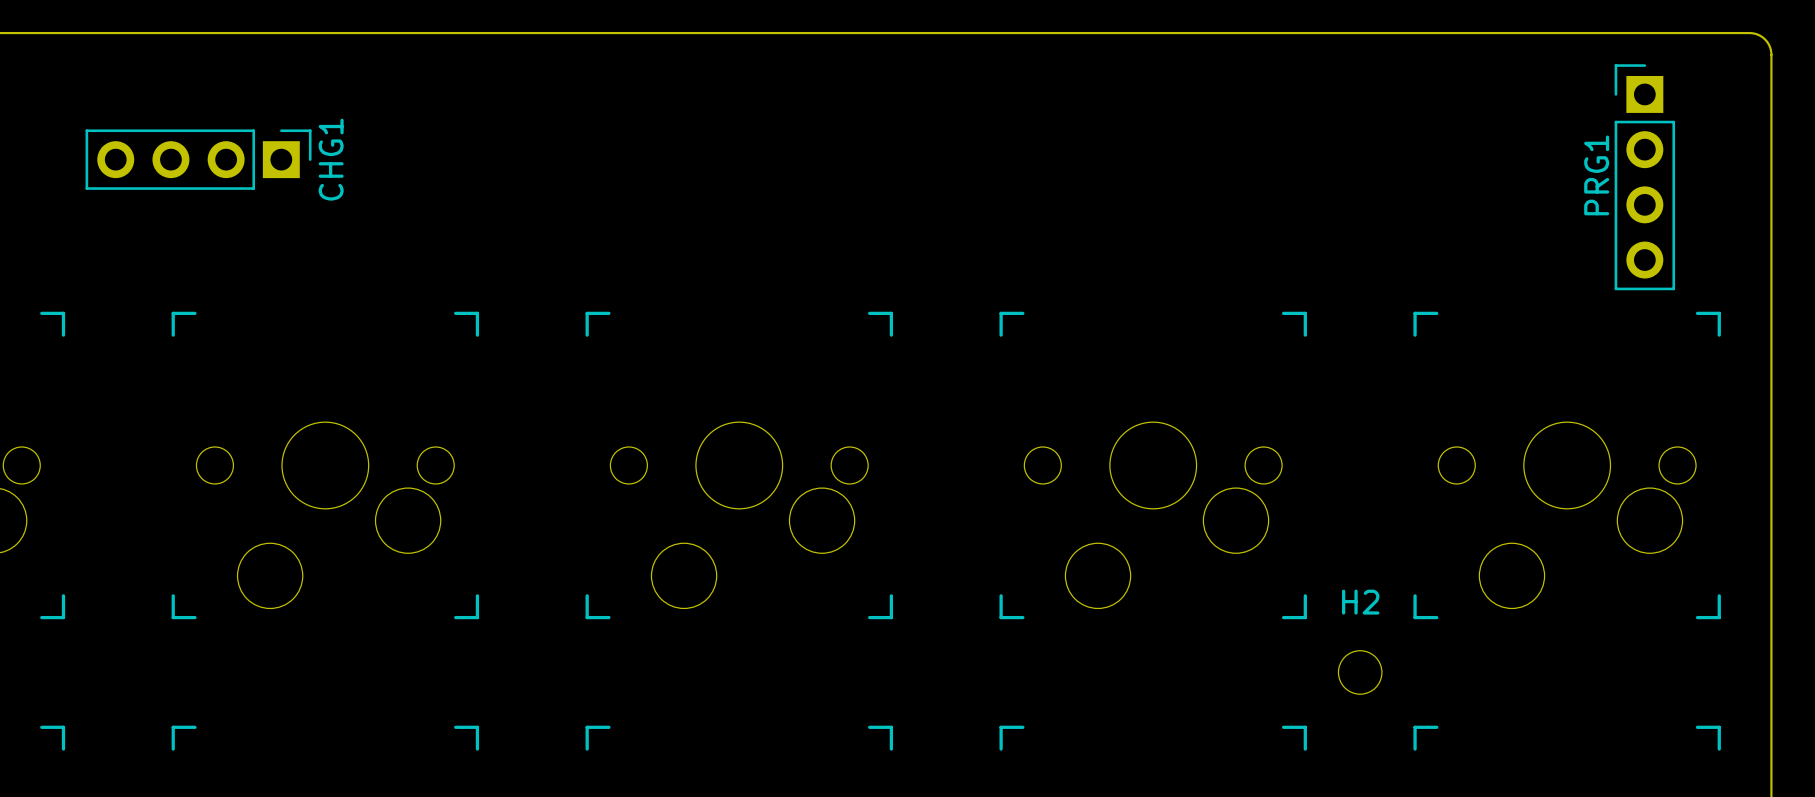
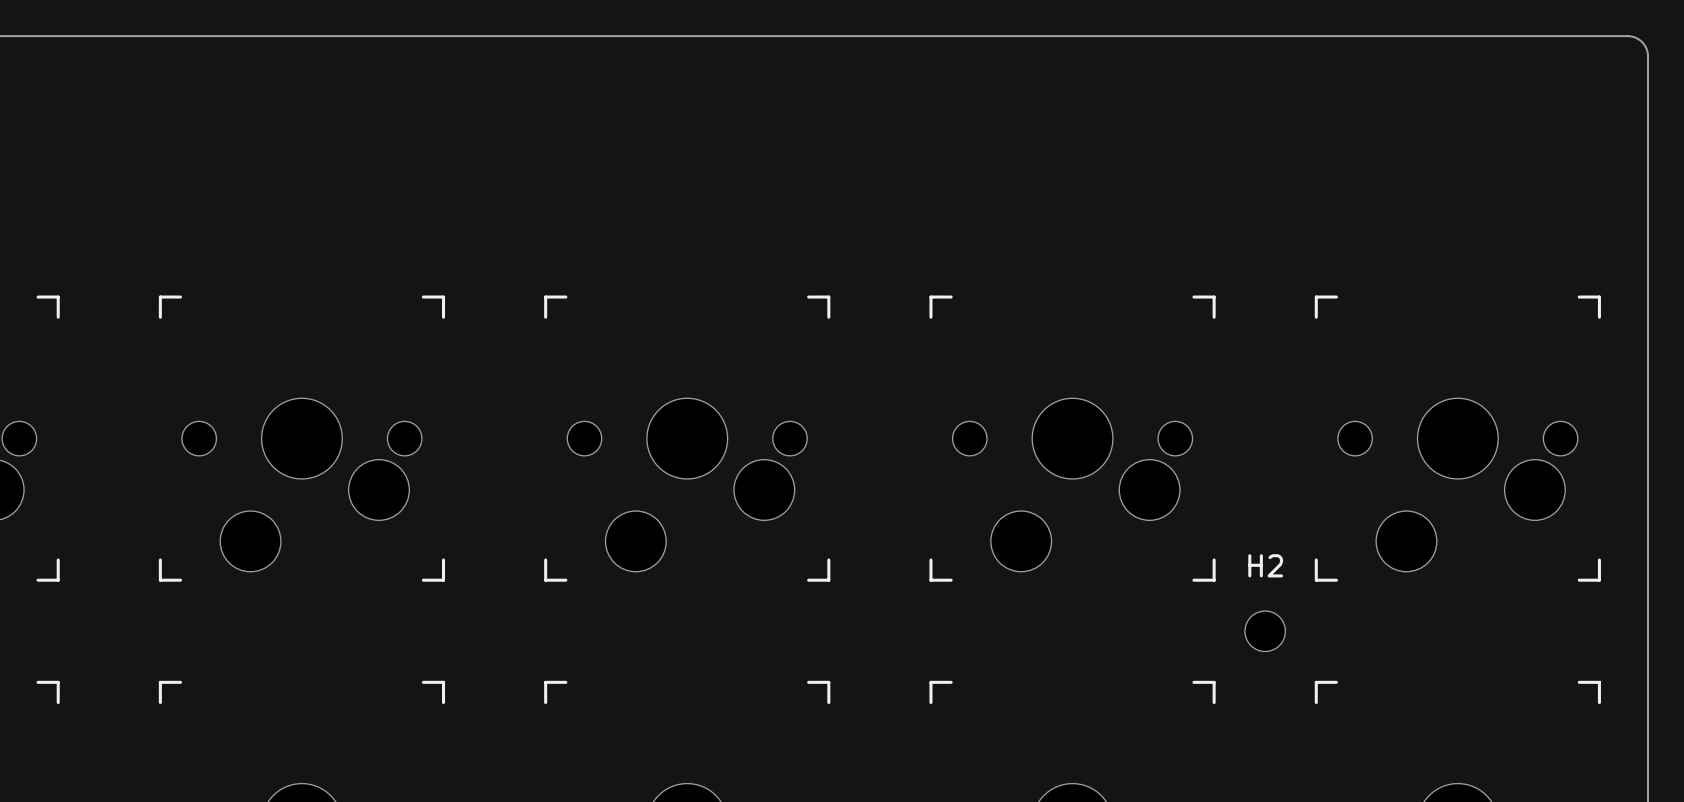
CHG1: (198, 159) -> none
PRG1: (1644, 177) -> none

